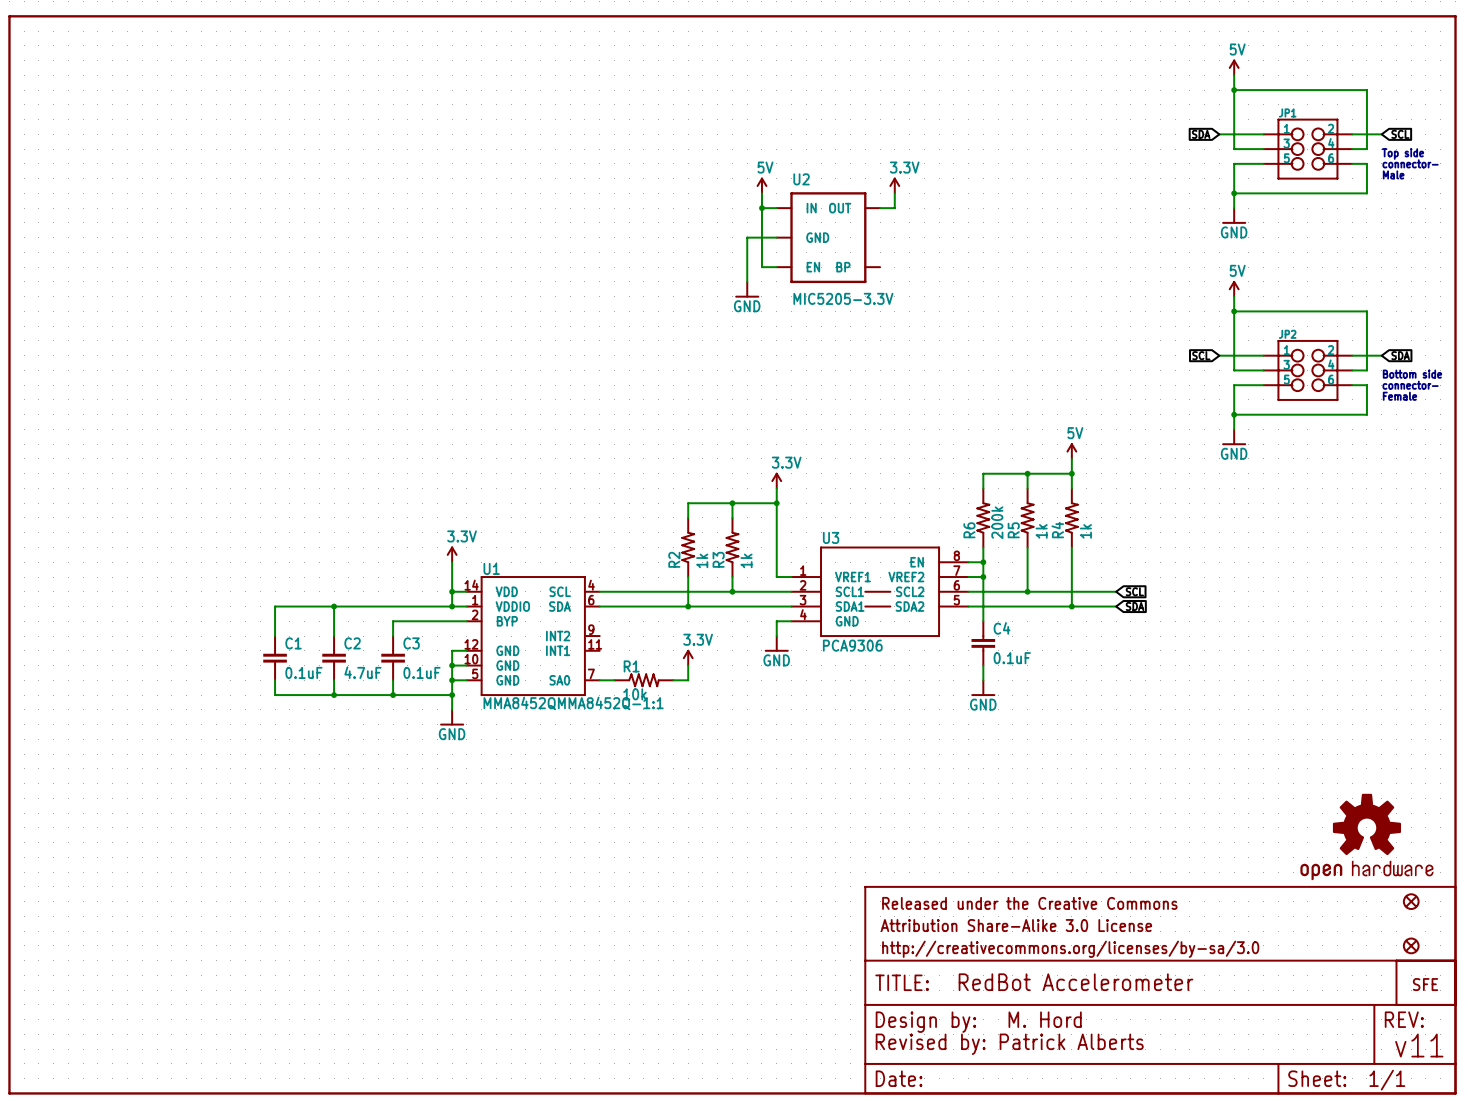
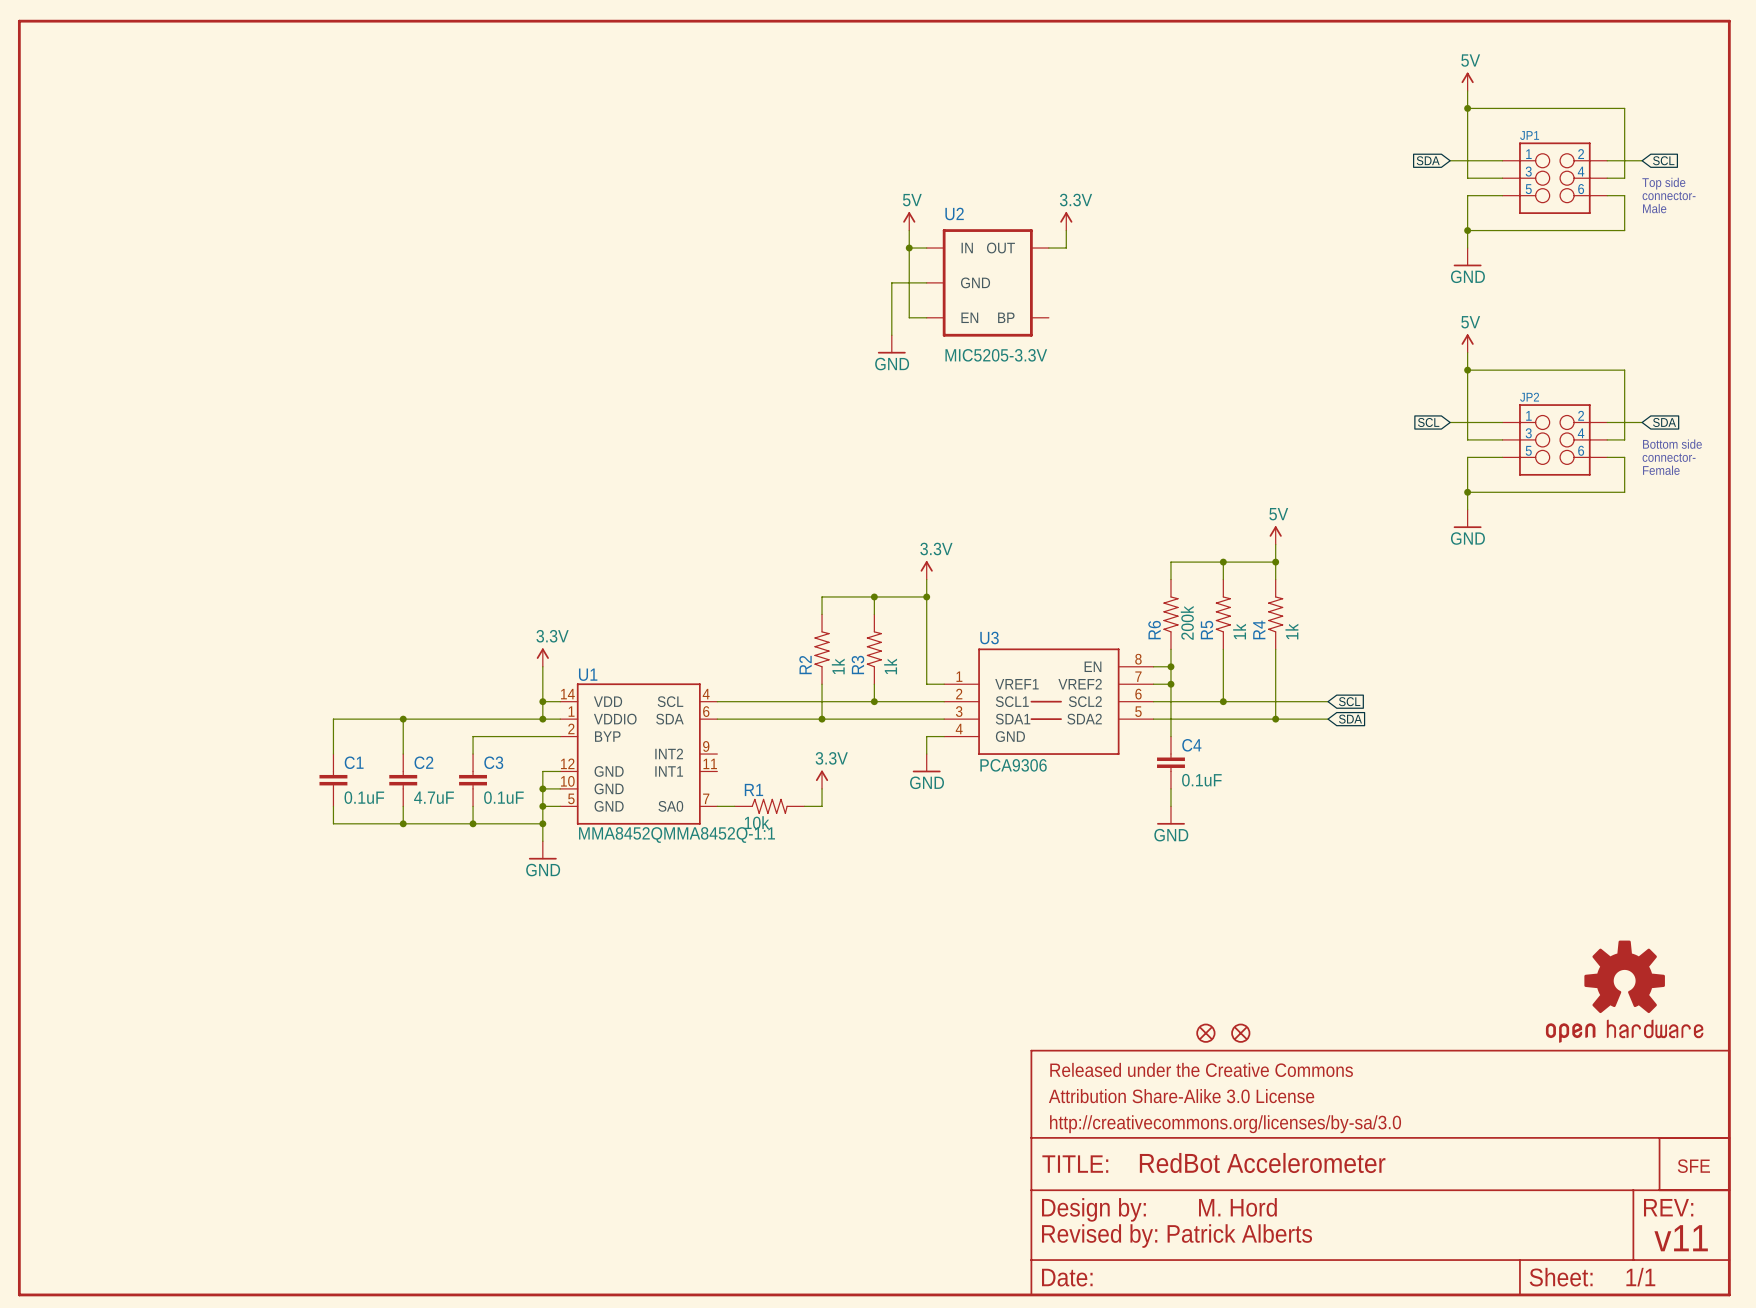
part: none -> (1205, 1033)
part: none -> (1240, 1033)
part: (1411, 901) -> none
part: (1411, 945) -> none

